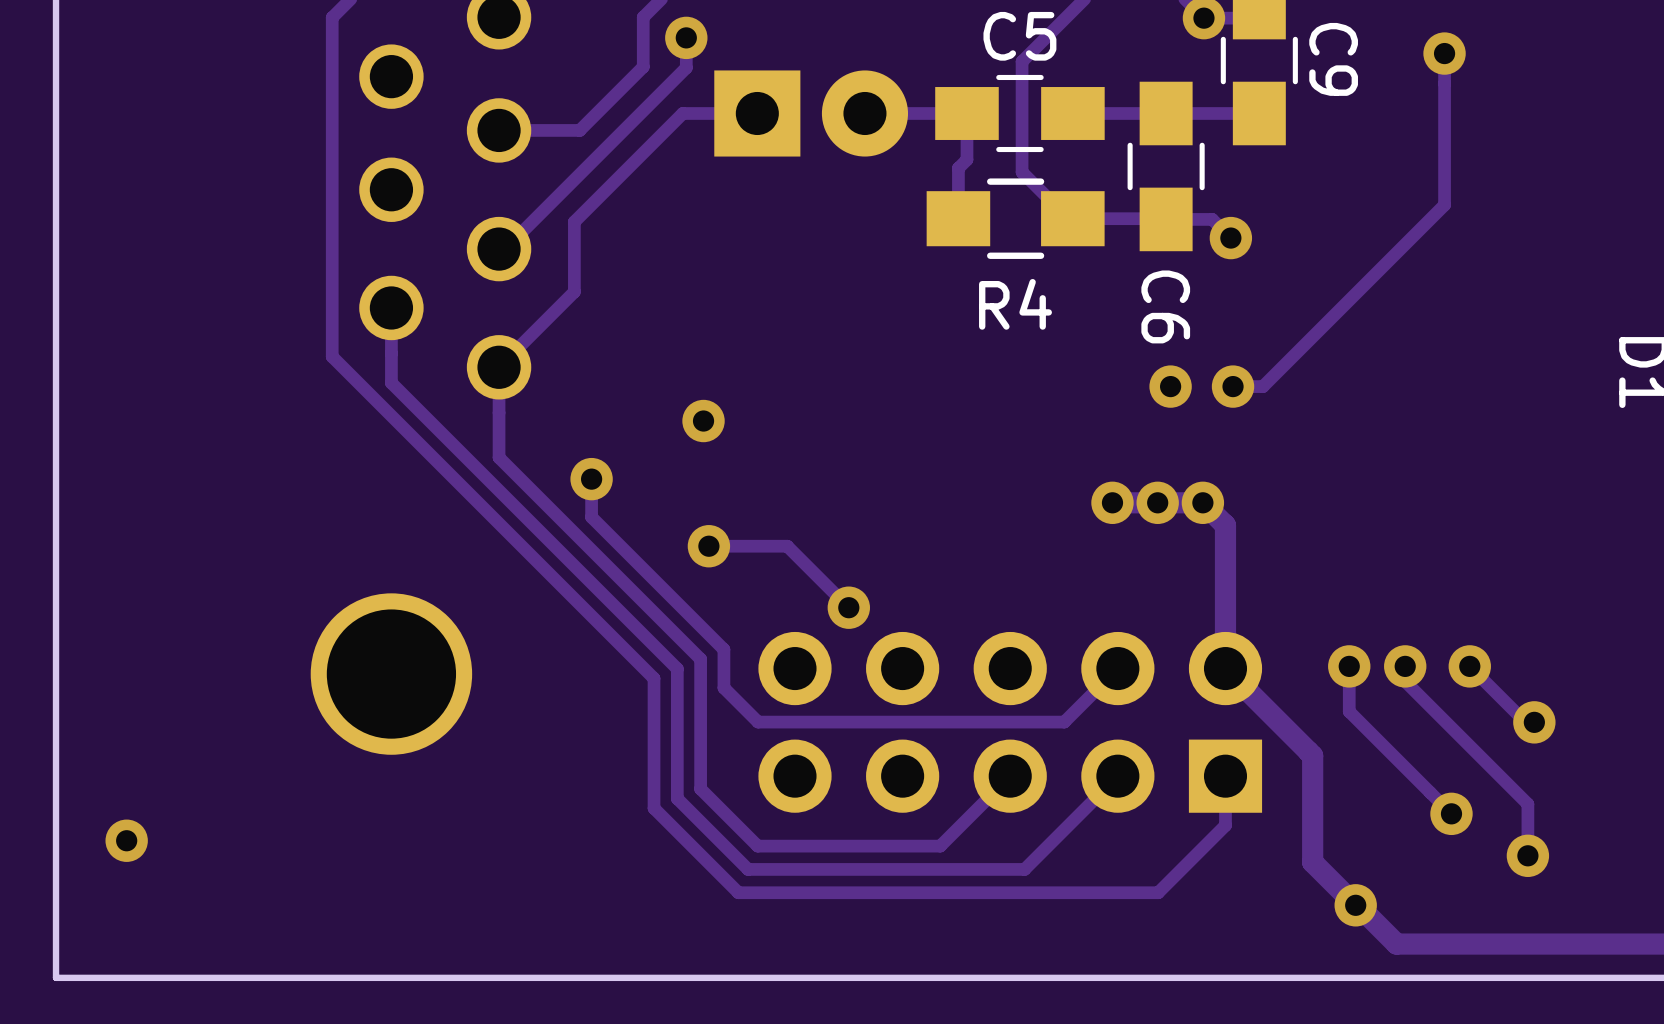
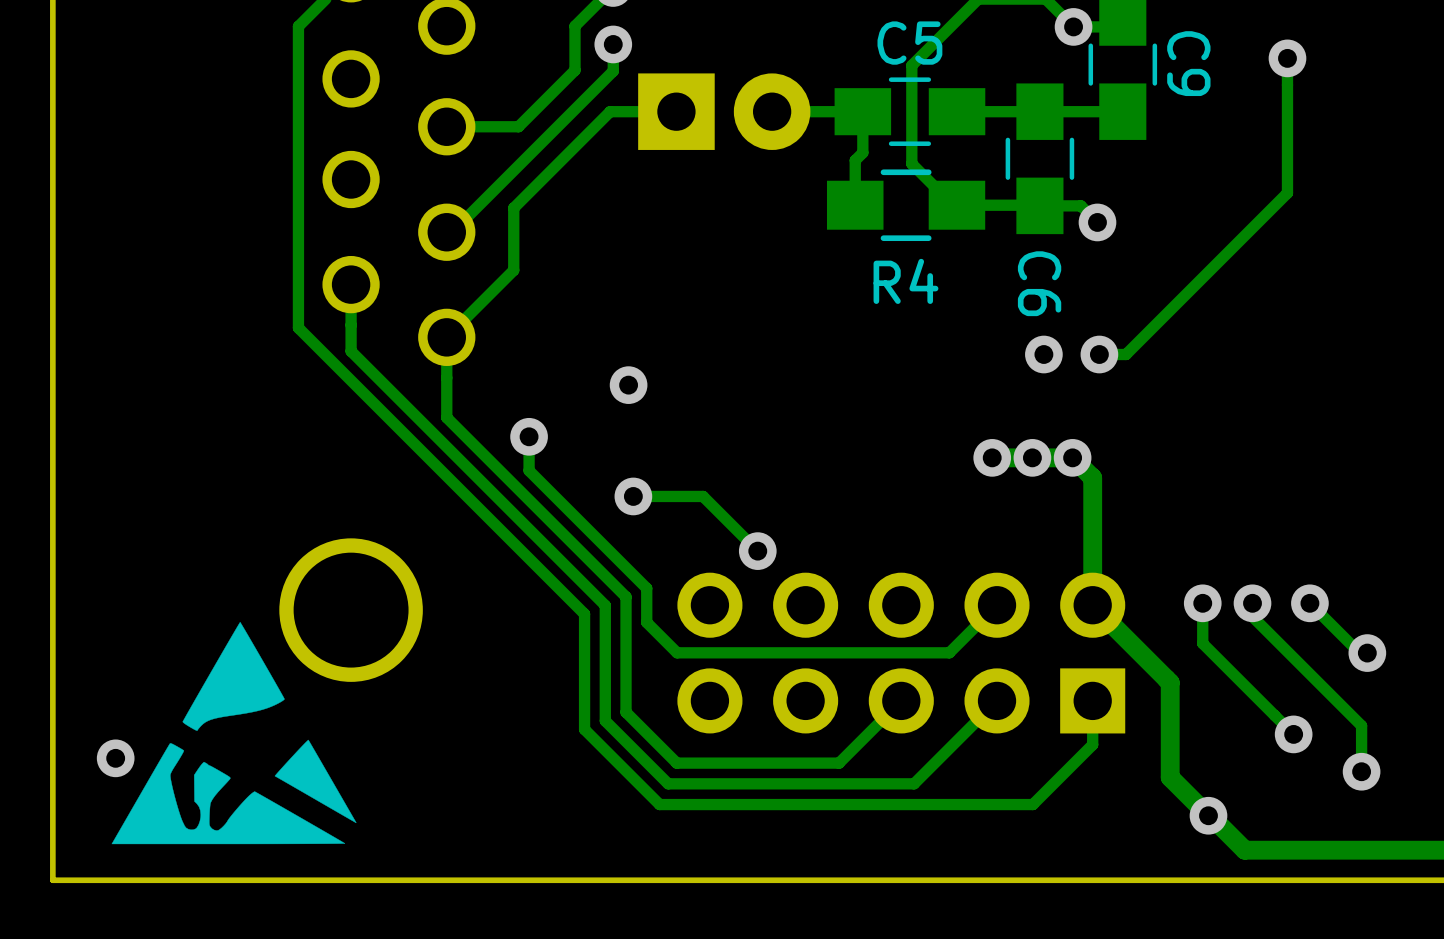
drawing: none -> [111, 622, 357, 845]

